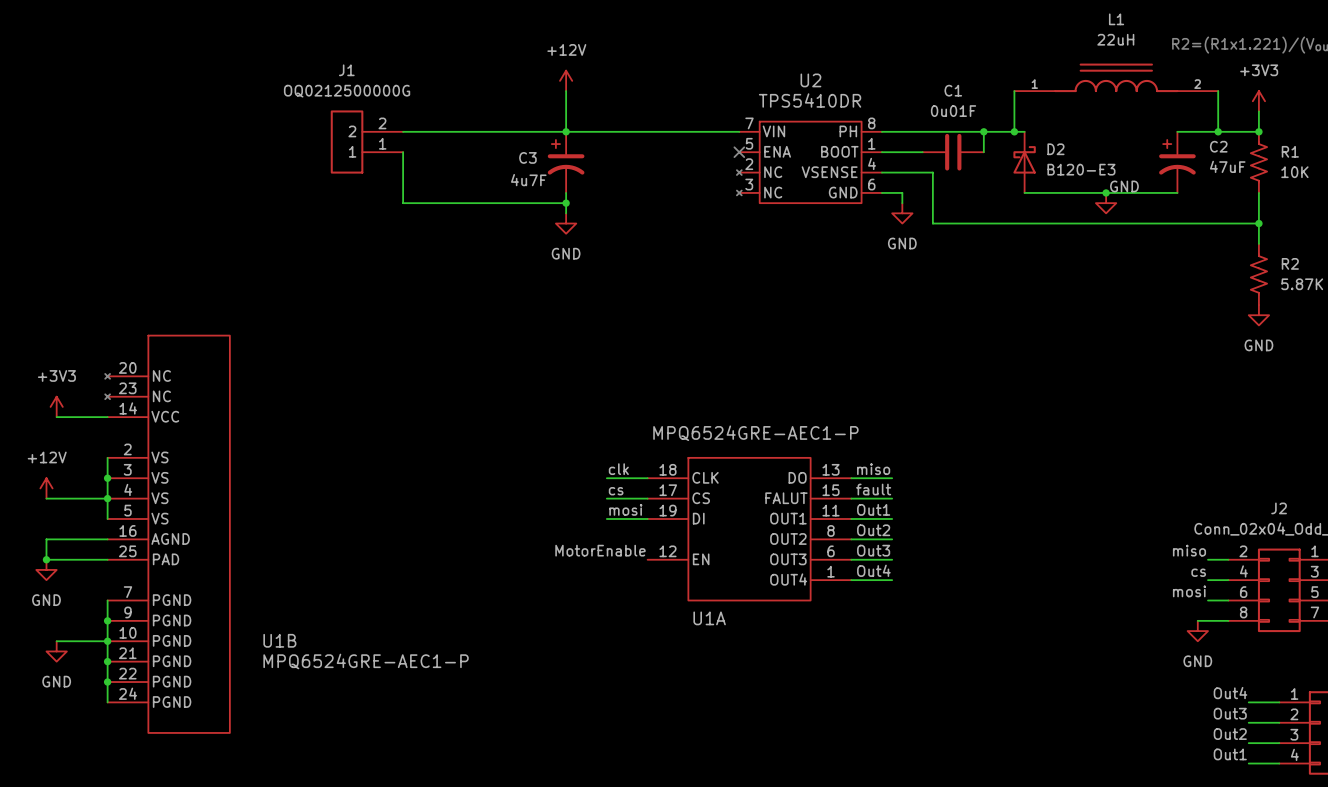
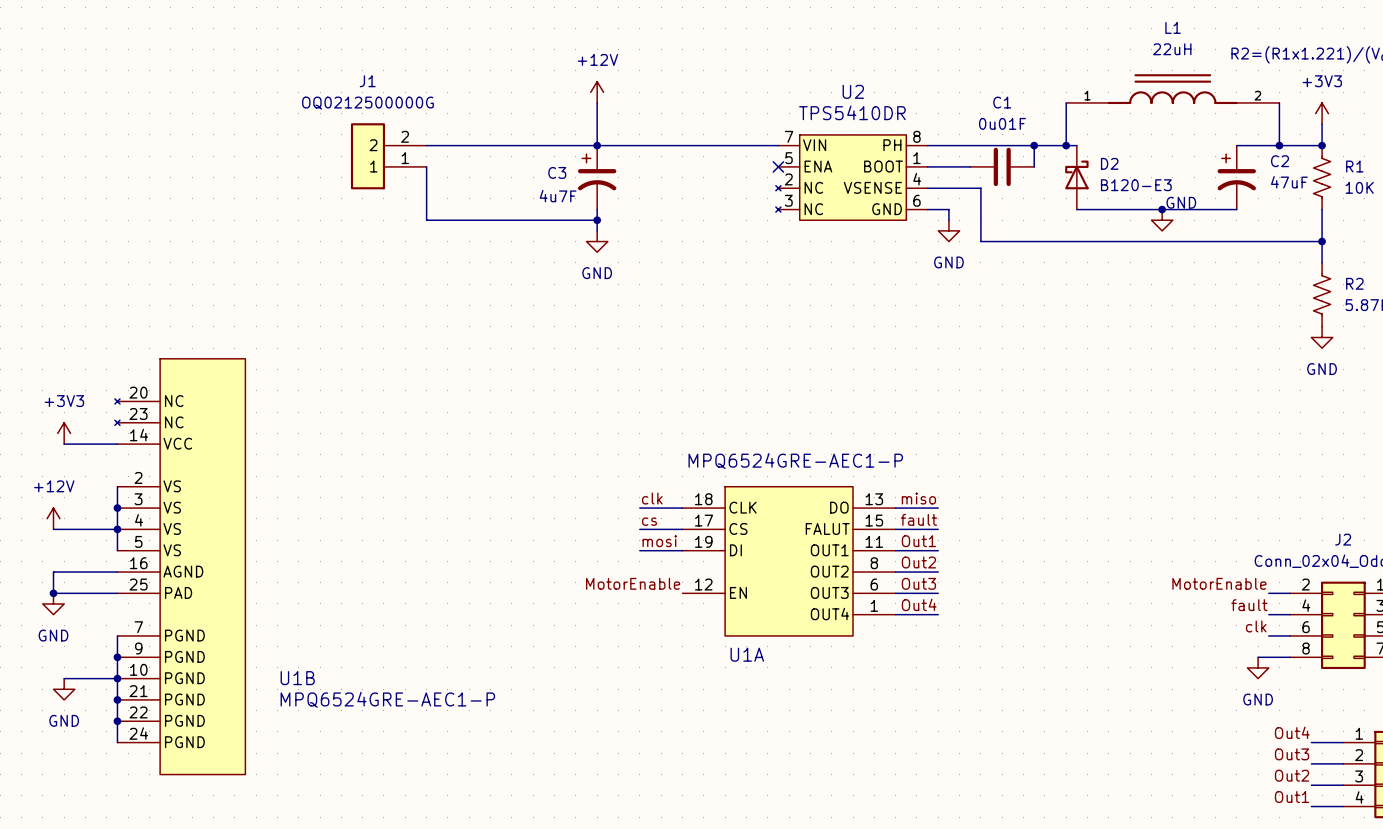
label: miso (1189, 550) -> MotorEnable (1219, 583)
label: cs (1198, 572) -> fault (1249, 605)
label: mosi (1189, 591) -> clk (1256, 626)

